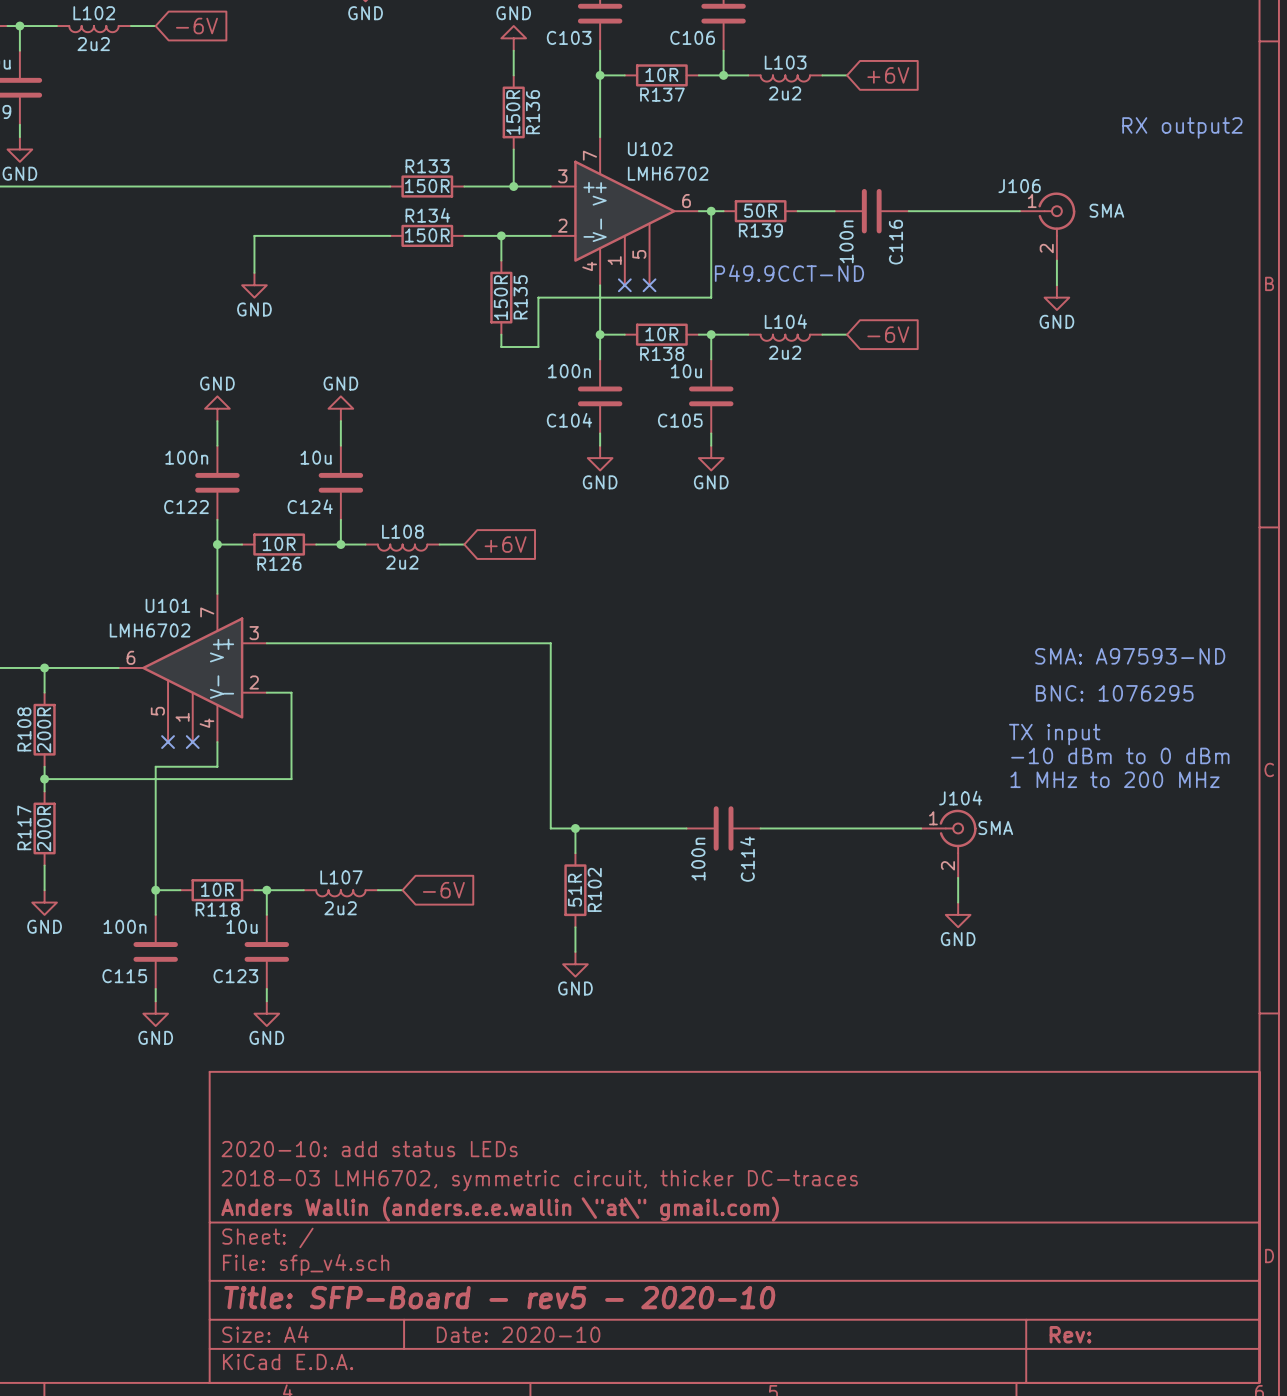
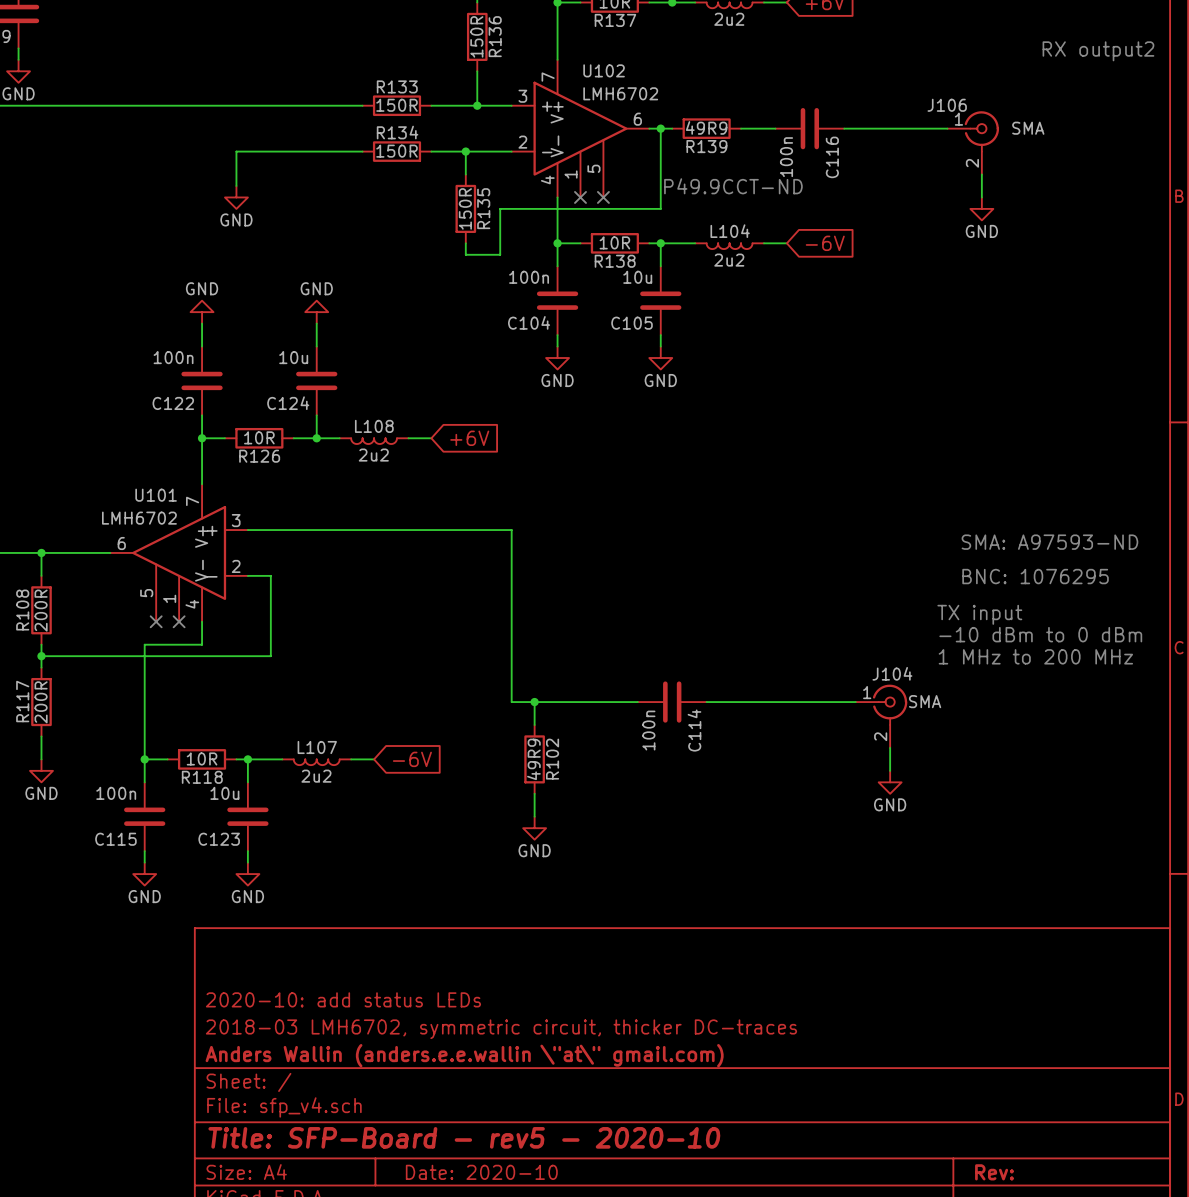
R139 value: 50R (760, 210) -> 49R9 (706, 127)
R102 value: 51R (574, 890) -> 49R9 (533, 759)

